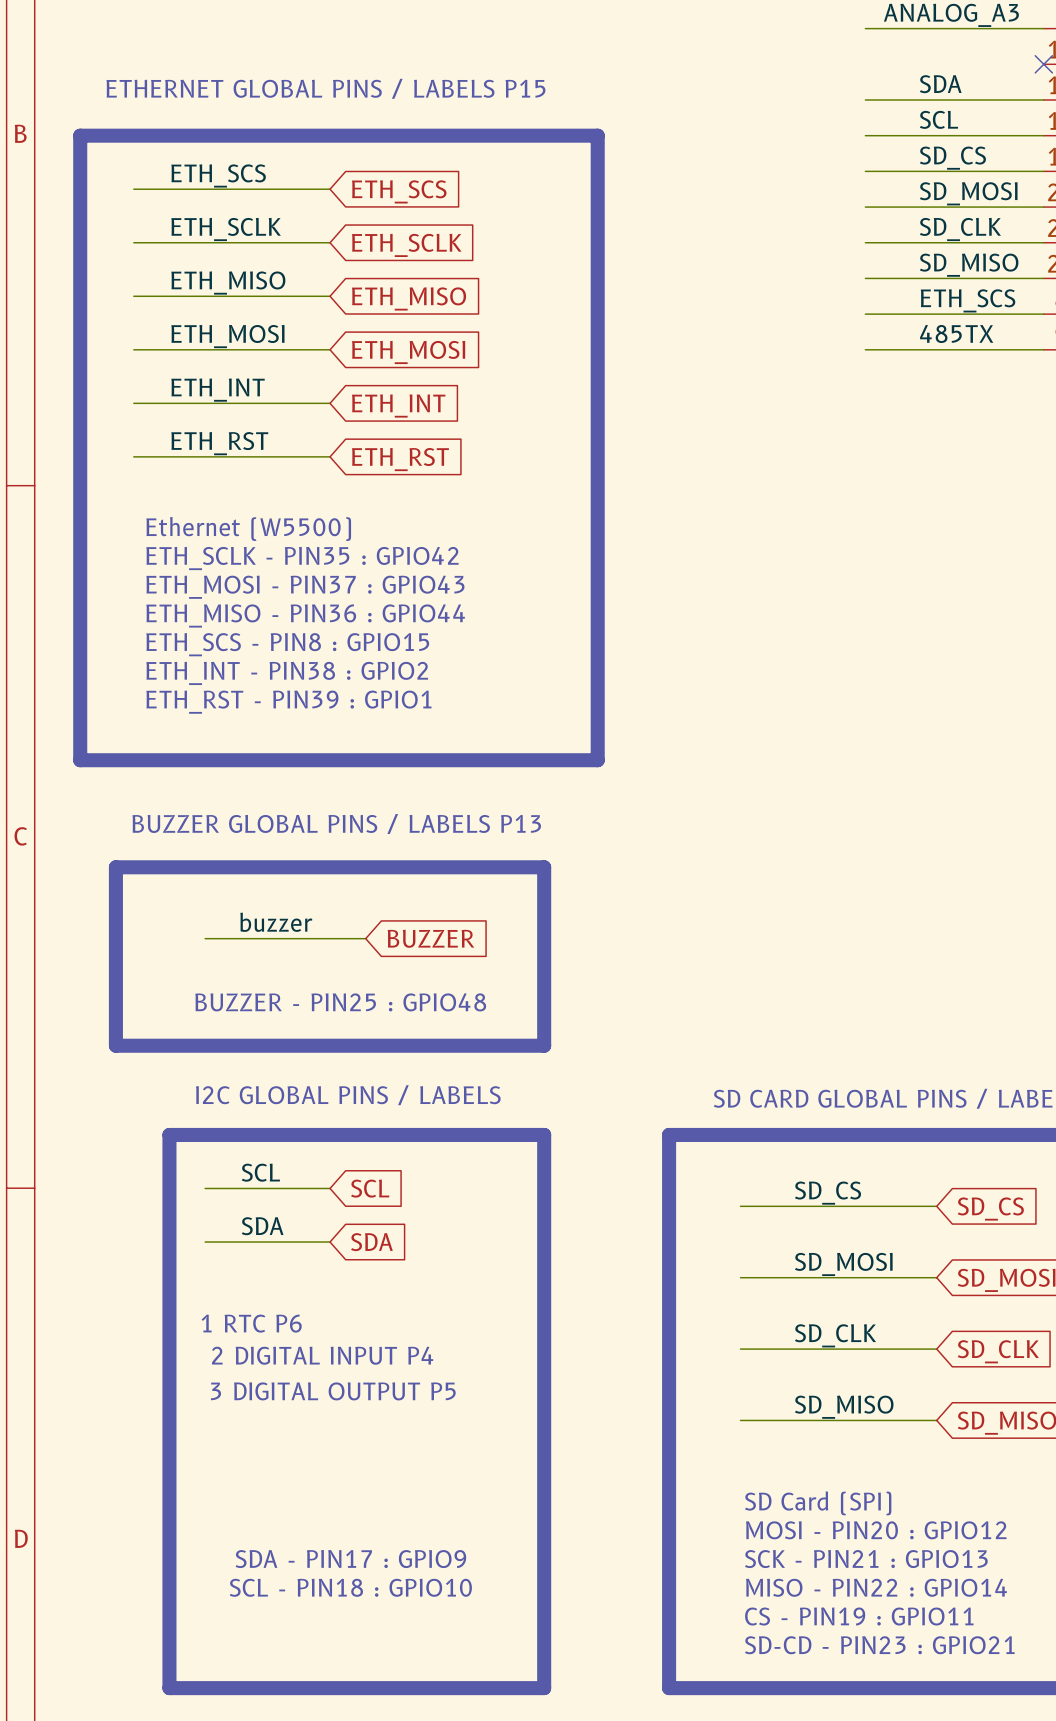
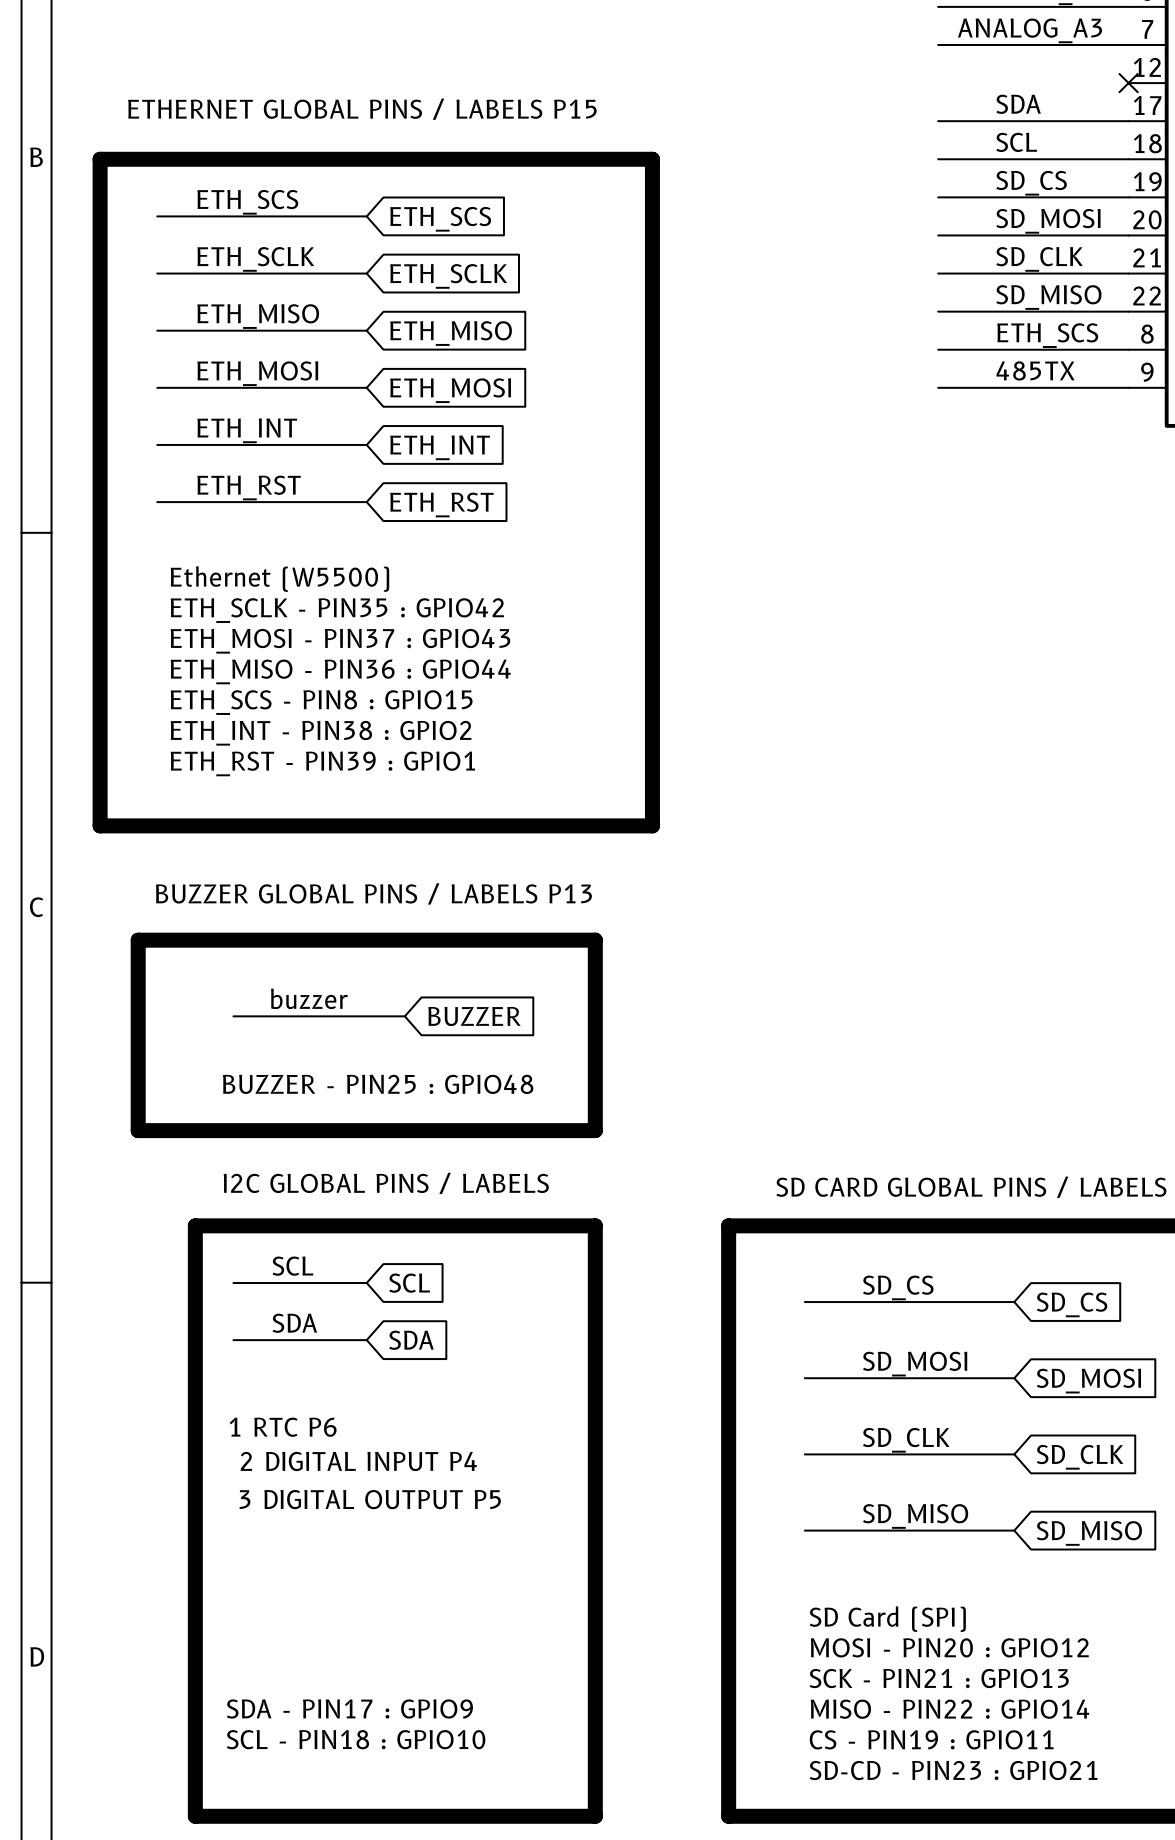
text position: SDA - PIN17 : GPIO9 (350, 1559) -> SDA - PIN17 : GPIO9 (349, 1708)
text position: SCL - PIN18 : GPIO10 (350, 1587) -> SCL - PIN18 : GPIO10 (356, 1739)

